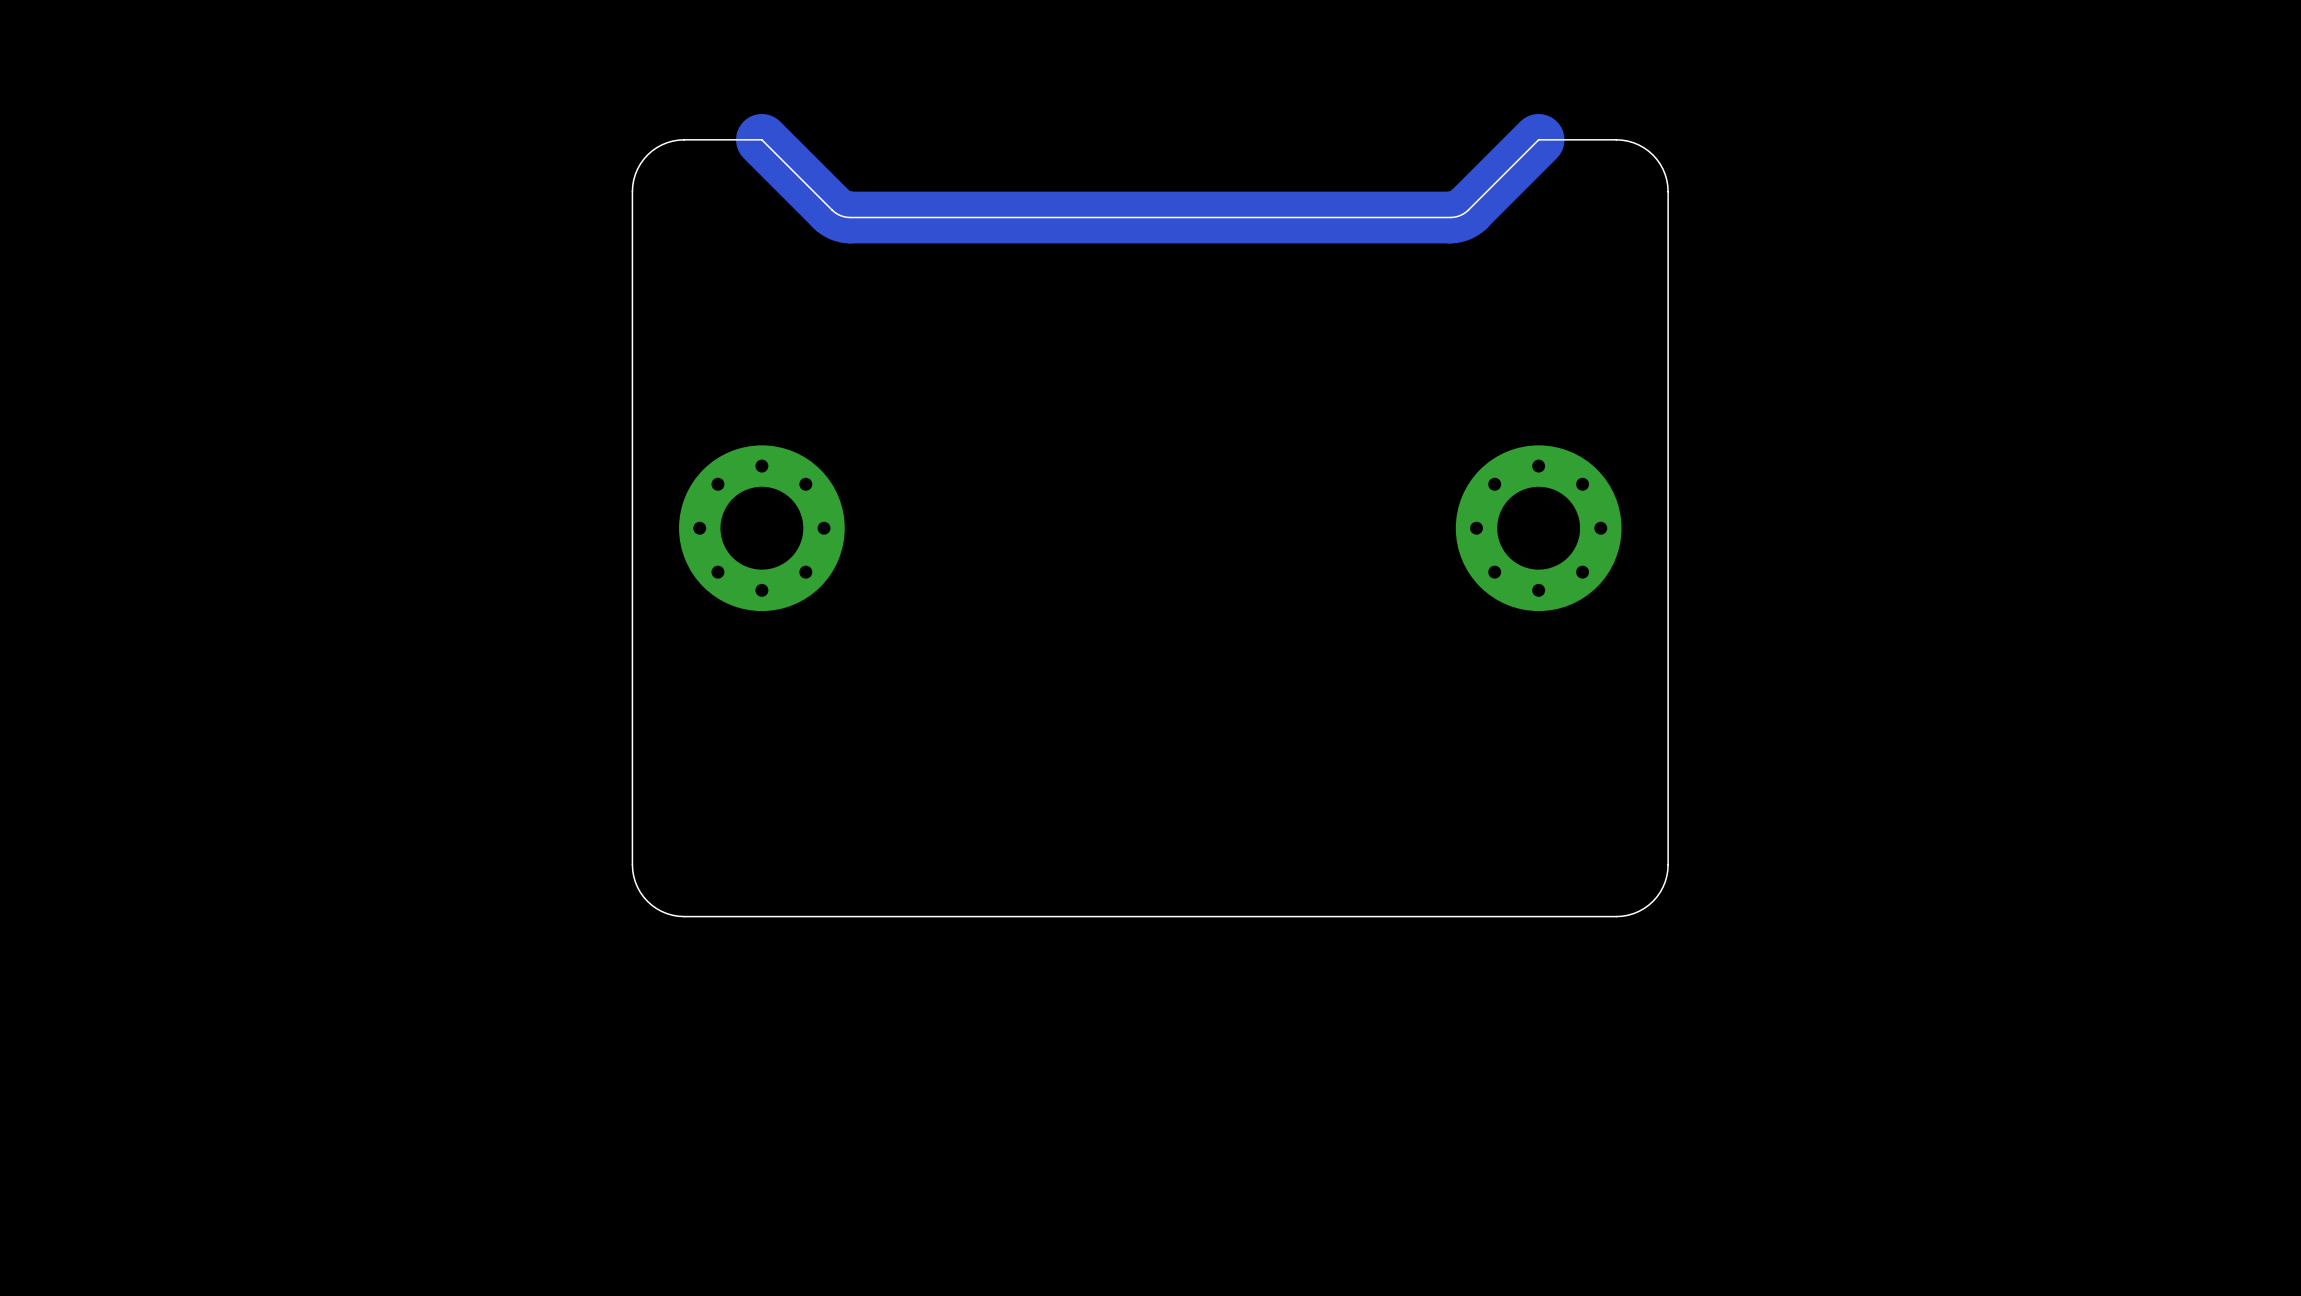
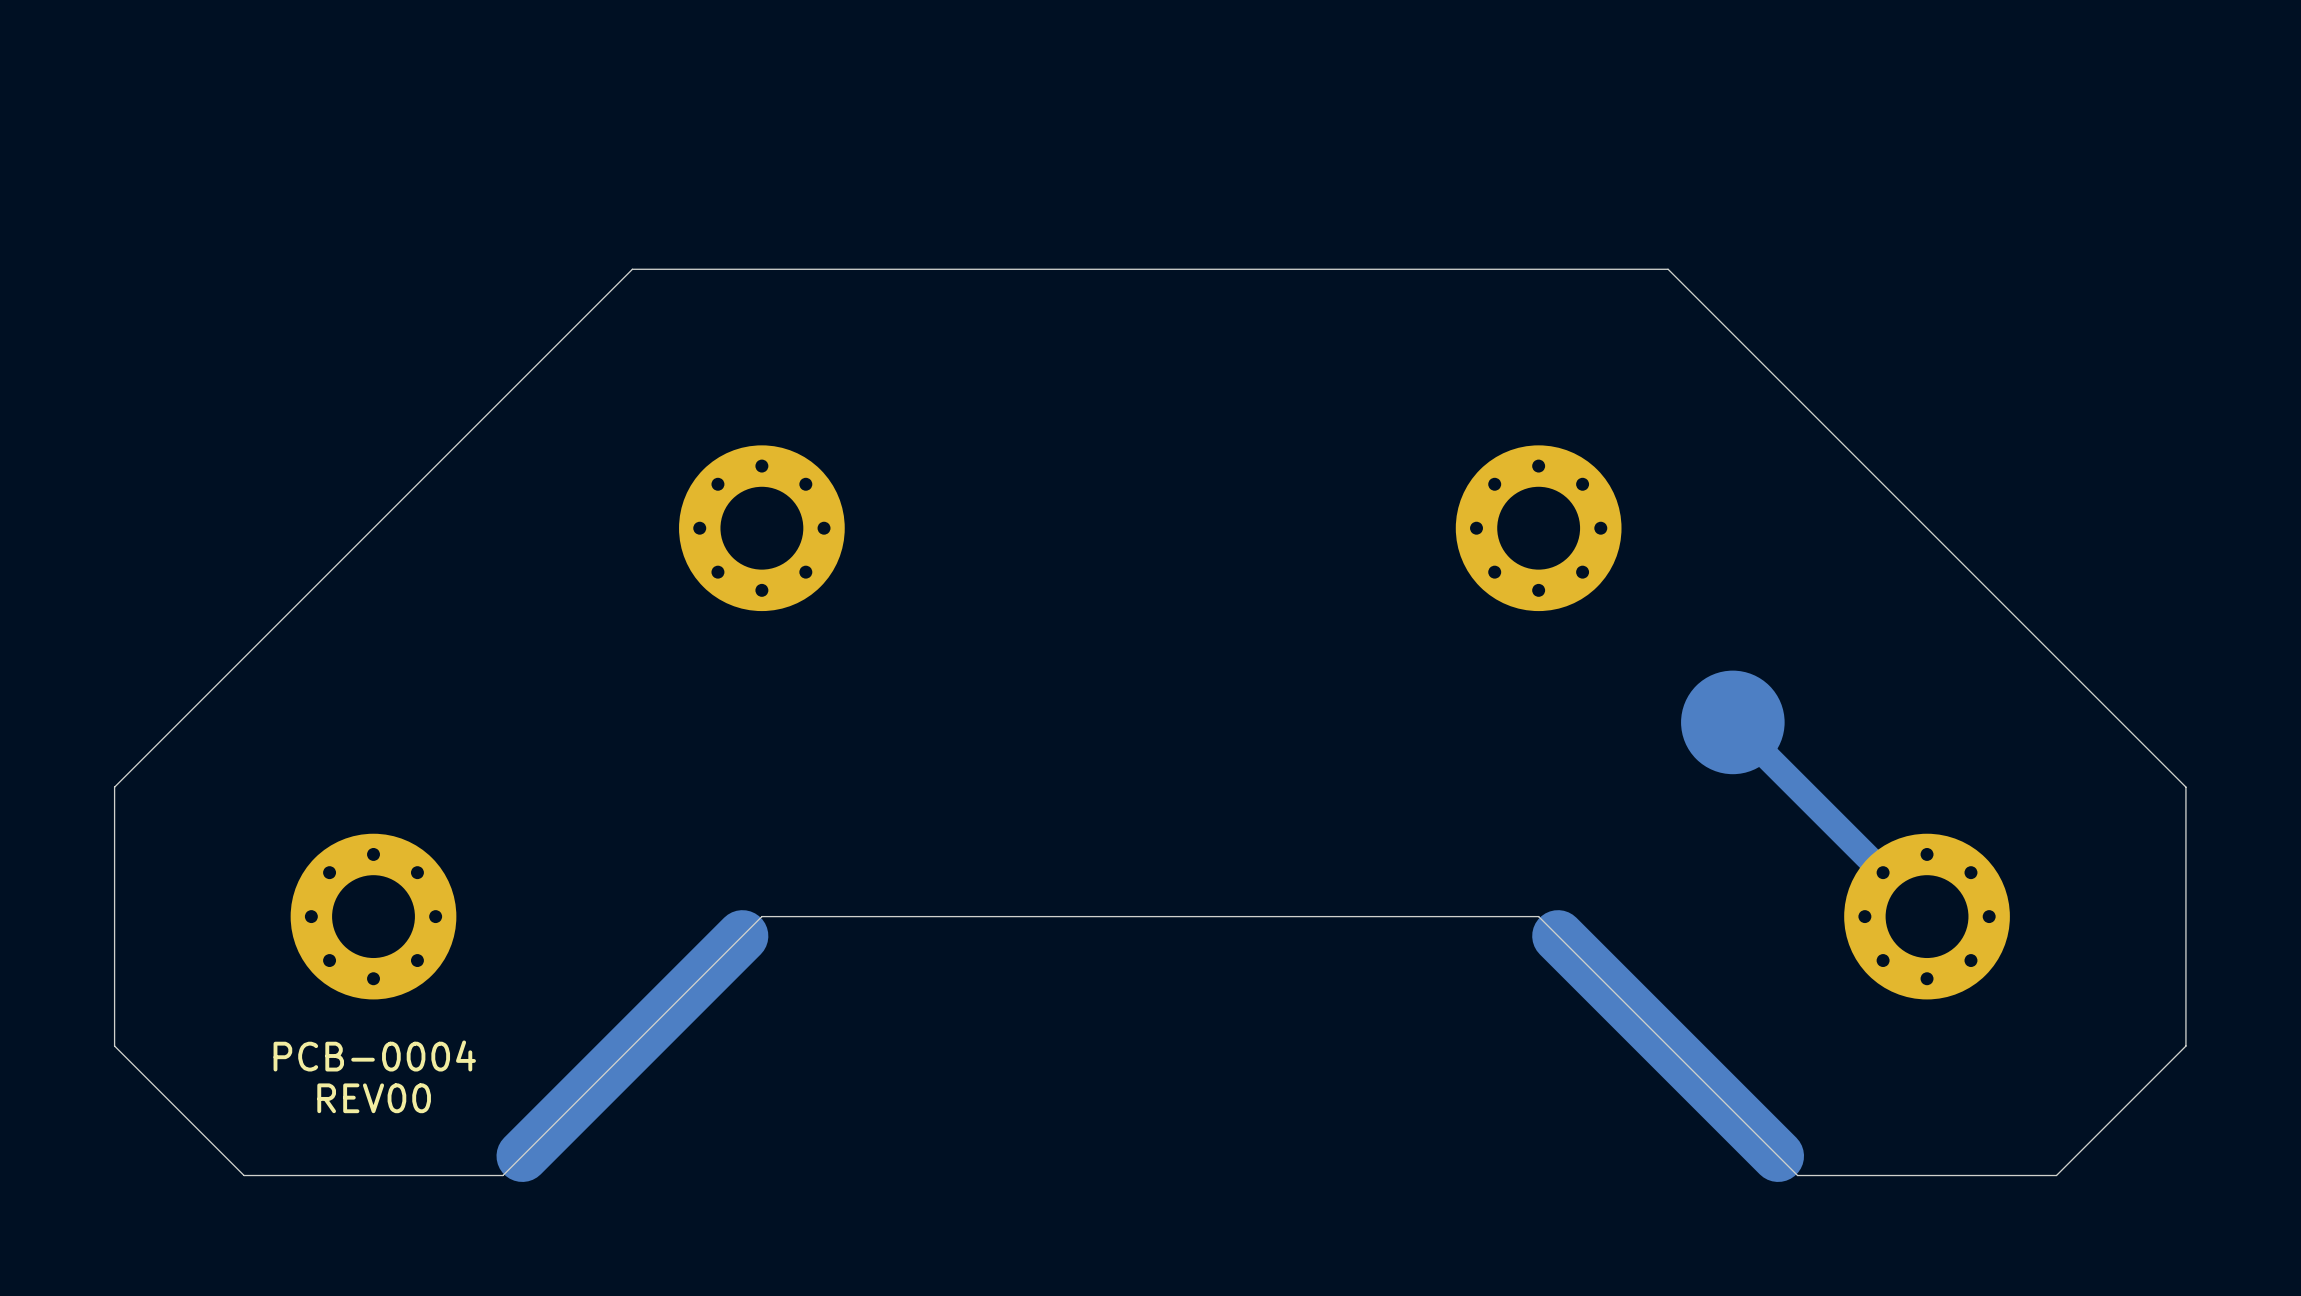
track: (1538, 139) (1466, 211) (1450, 217) (847, 217) (833, 211) (761, 139) -> none
track: none -> (1732, 722) (1927, 916)
part: none -> (1732, 722)
part: none -> (373, 916)
board edge: (1538, 916) (1616, 916) (1633, 913) (1648, 905) (1656, 897) (1665, 881) (1667, 870) (1667, 185) (1662, 169) (1652, 154) (1638, 144) (1622, 140) (1538, 139) (1466, 211) (1450, 217) (847, 217) (833, 211) (761, 139) (678, 140) (661, 144) (647, 154) (635, 174) (632, 191) (632, 870) (635, 881) (643, 897) (651, 905) (667, 913) (684, 916) (761, 916) -> (1538, 916) (1797, 1175) (2056, 1175) (2185, 1046) (2185, 787) (1668, 269) (632, 269) (114, 787) (114, 1046) (244, 1175) (502, 1175) (761, 916)
part: none -> (1927, 916)
track: none -> (742, 936) (522, 1156)
track: none -> (1558, 936) (1778, 1156)
text: none -> PCB-0004 (374, 1055)
text: none -> REV00 (374, 1098)

